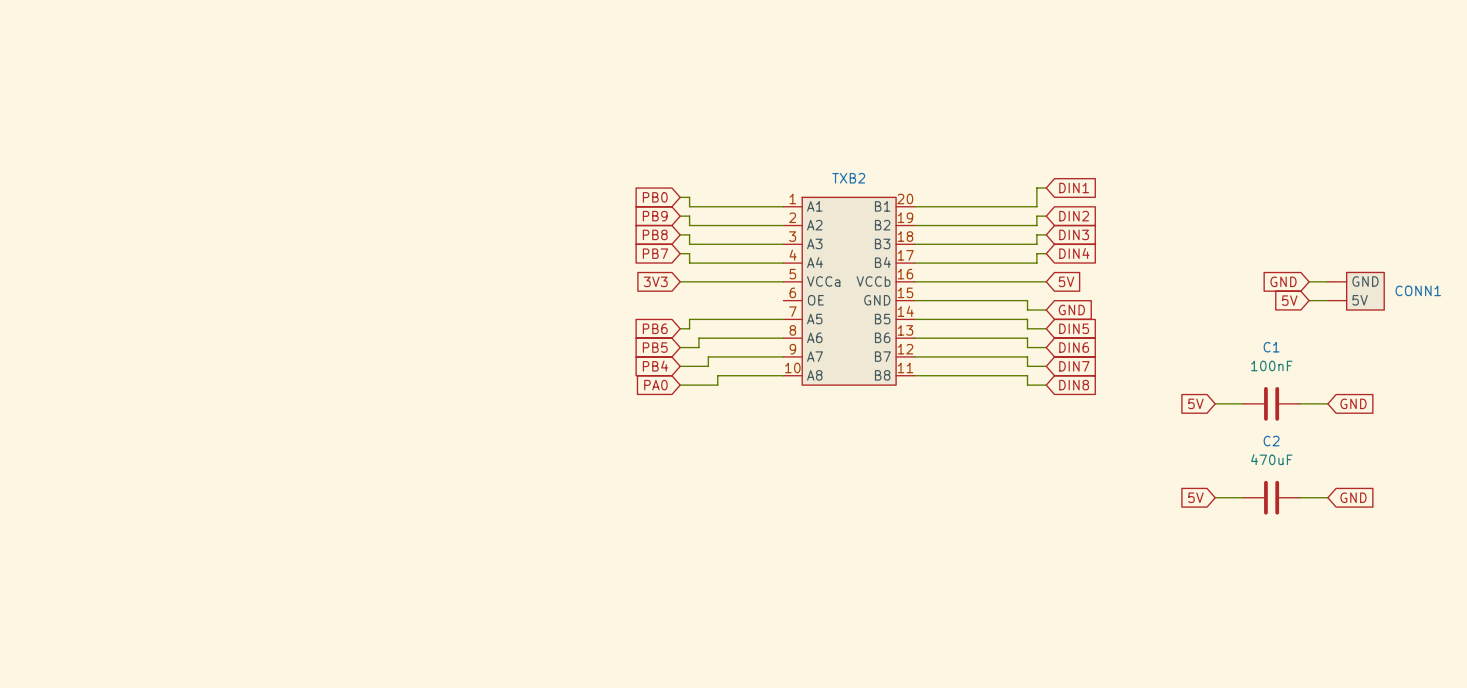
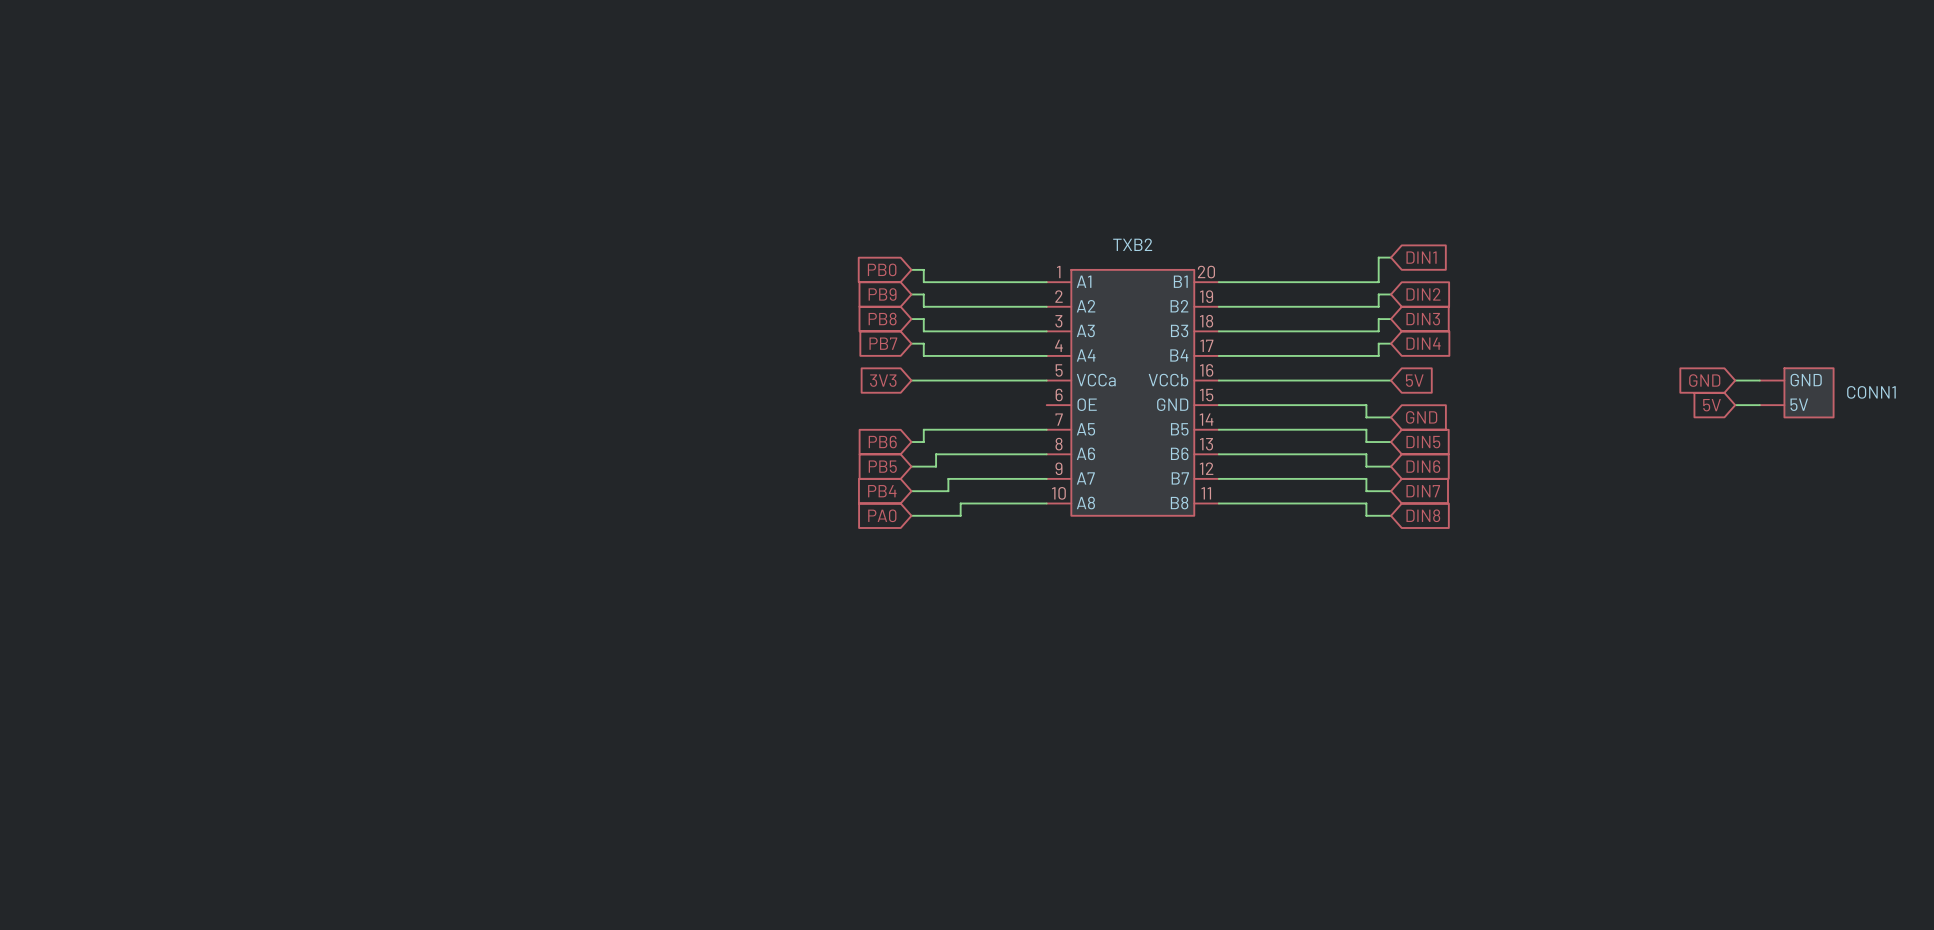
global label: 5V (1195, 403) -> none
wire: (1215, 403) (1243, 403) -> none
C1: 100nF (1271, 403) -> none
wire: (1299, 403) (1327, 403) -> none
global label: GND (1353, 403) -> none
global label: 5V (1195, 497) -> none
wire: (1215, 497) (1243, 497) -> none
C2: 470uF (1271, 497) -> none
wire: (1299, 497) (1327, 497) -> none
global label: GND (1353, 497) -> none

